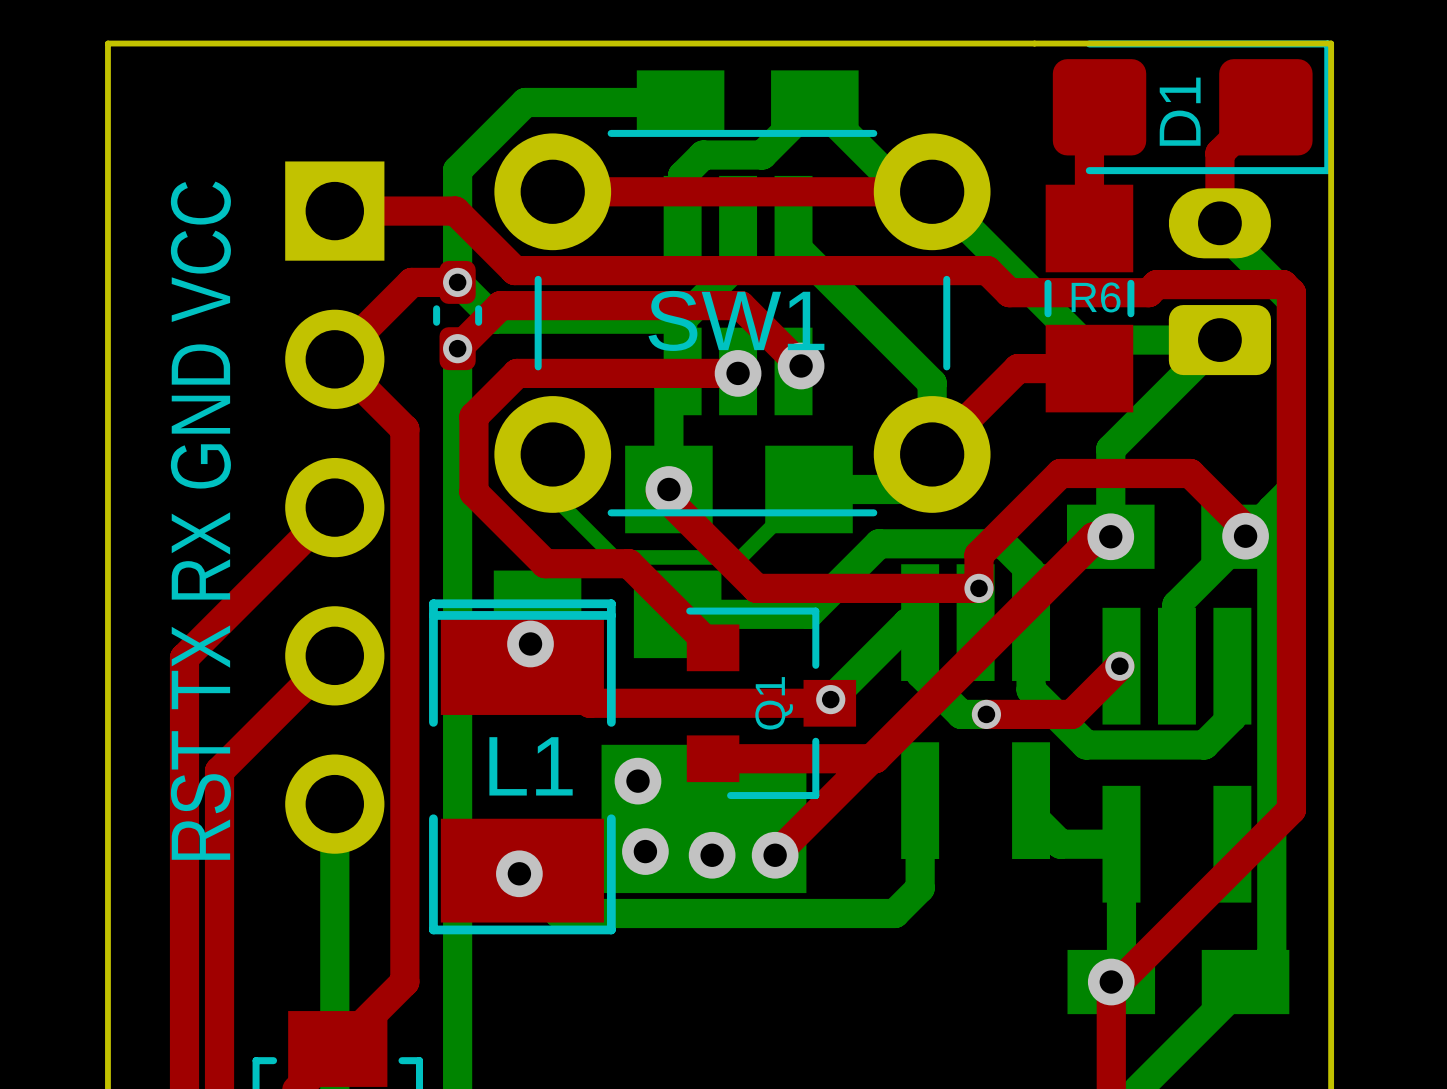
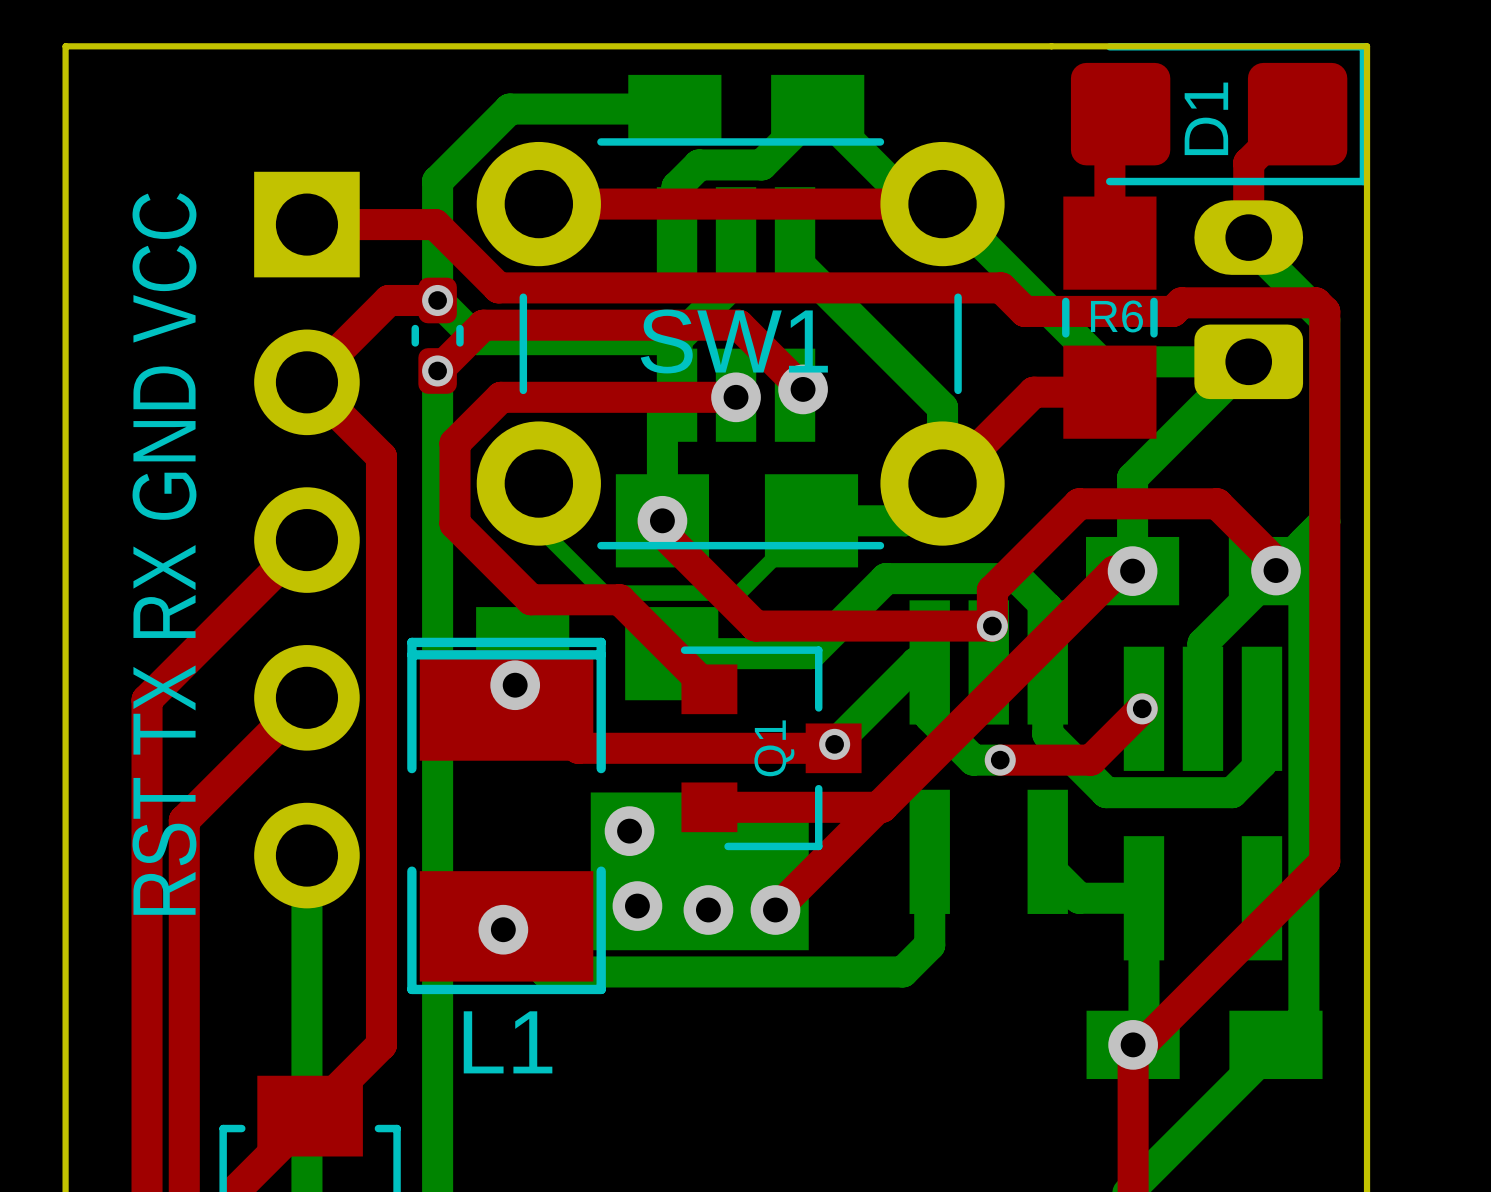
L1 name position: L1 (531, 766) -> L1 (508, 1042)

